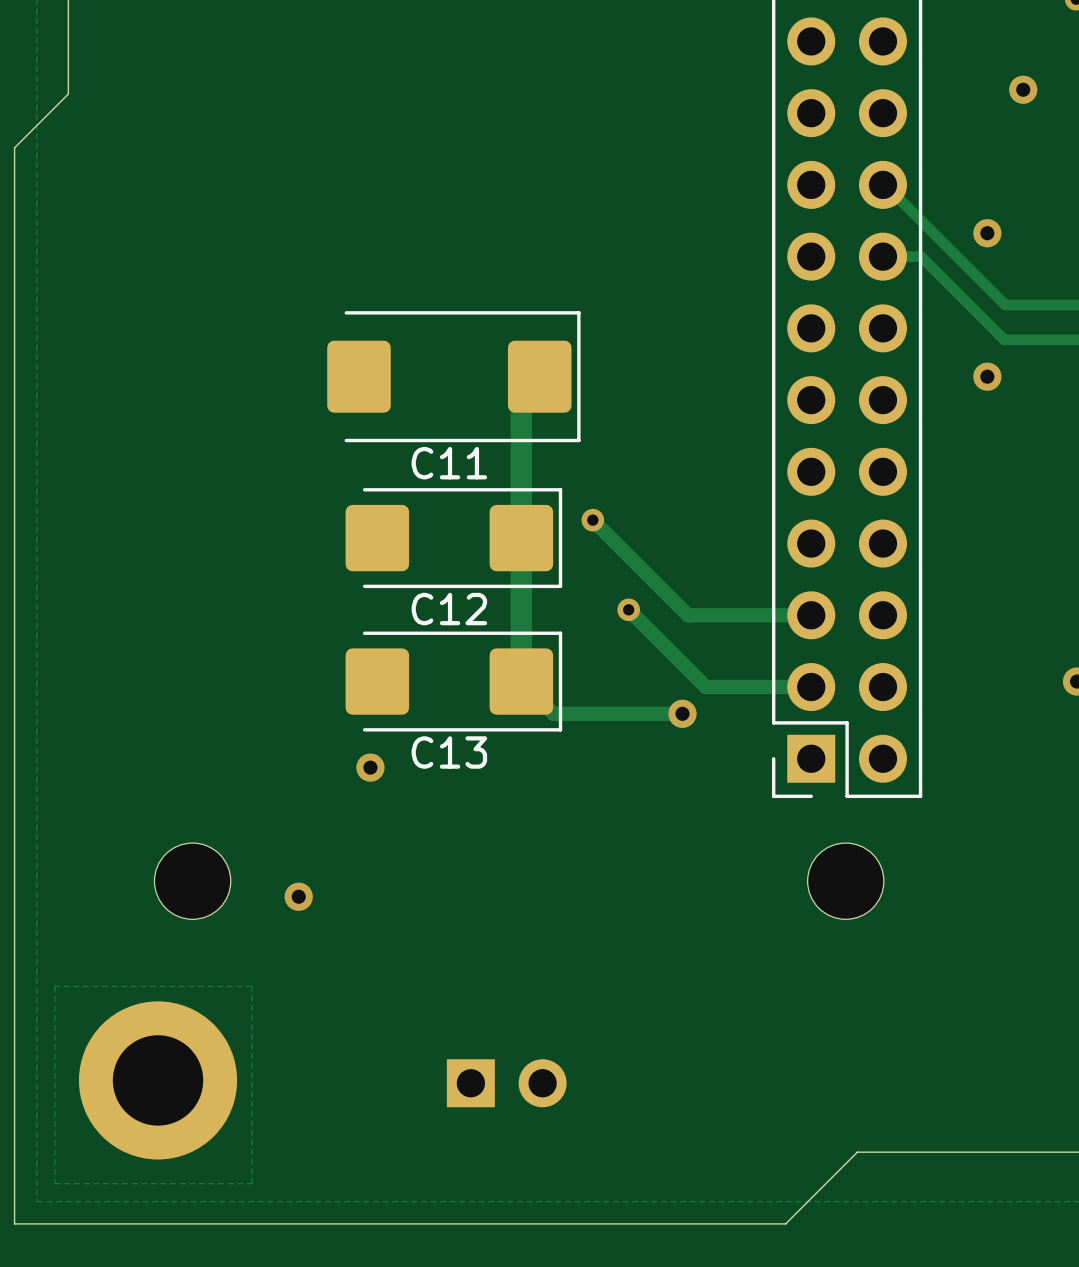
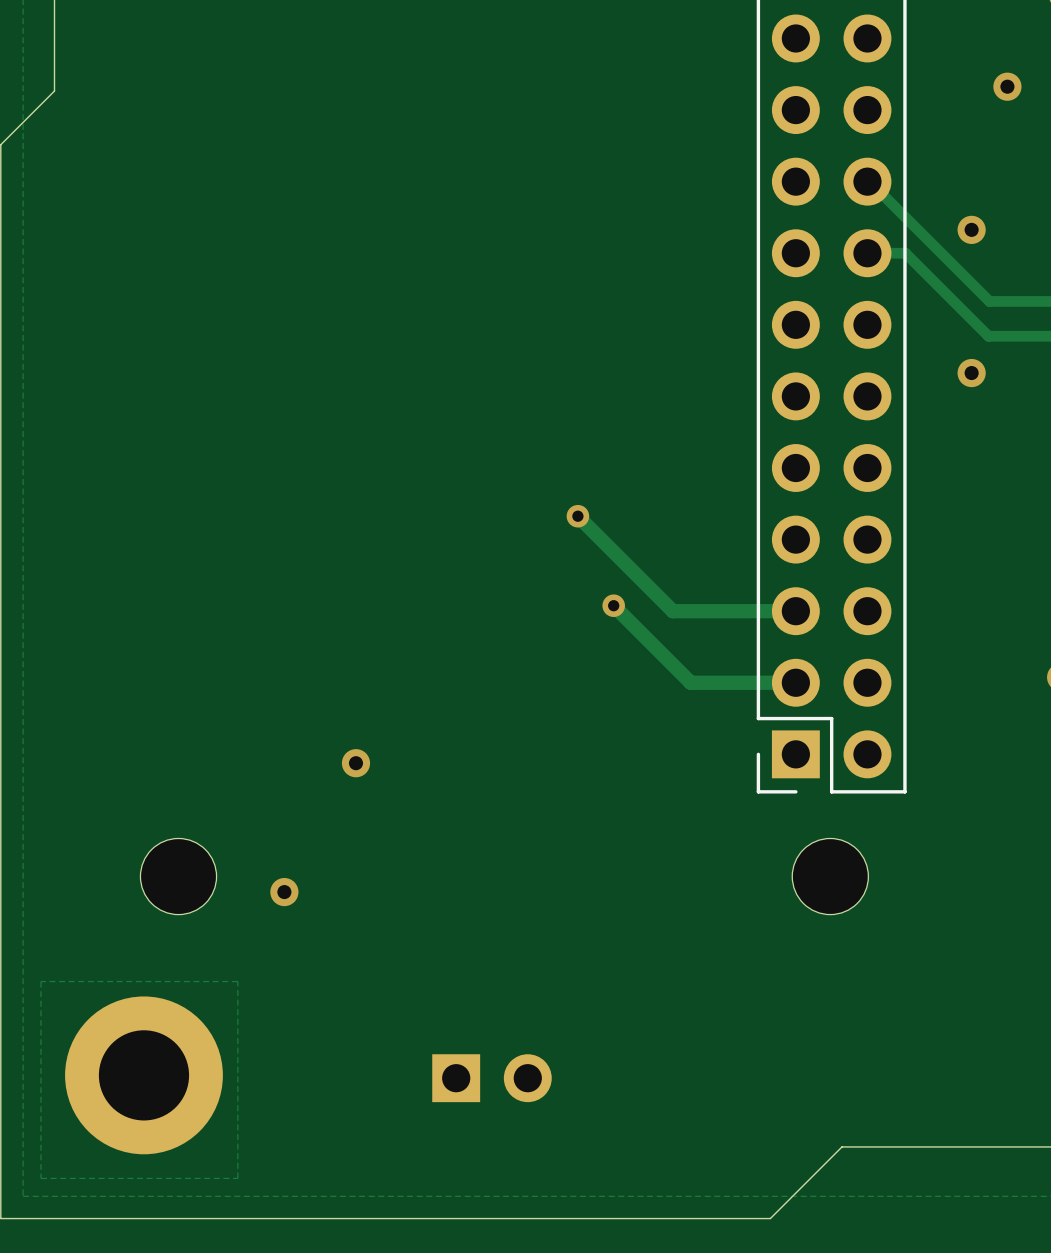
C11: (453, 376) -> none
track: (539, 376) (521, 395) (521, 681) (553, 713) (682, 713) -> none
C12: (453, 538) -> none
C13: (453, 681) -> none
via: (682, 713) -> none

